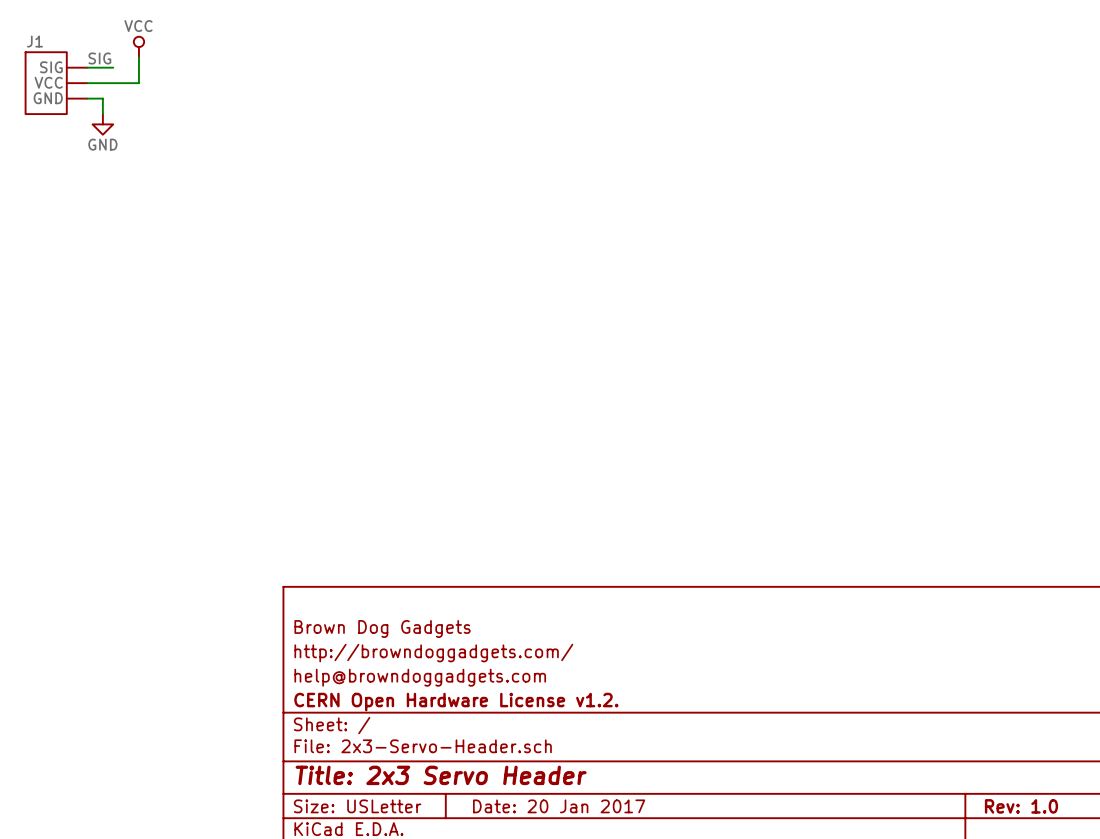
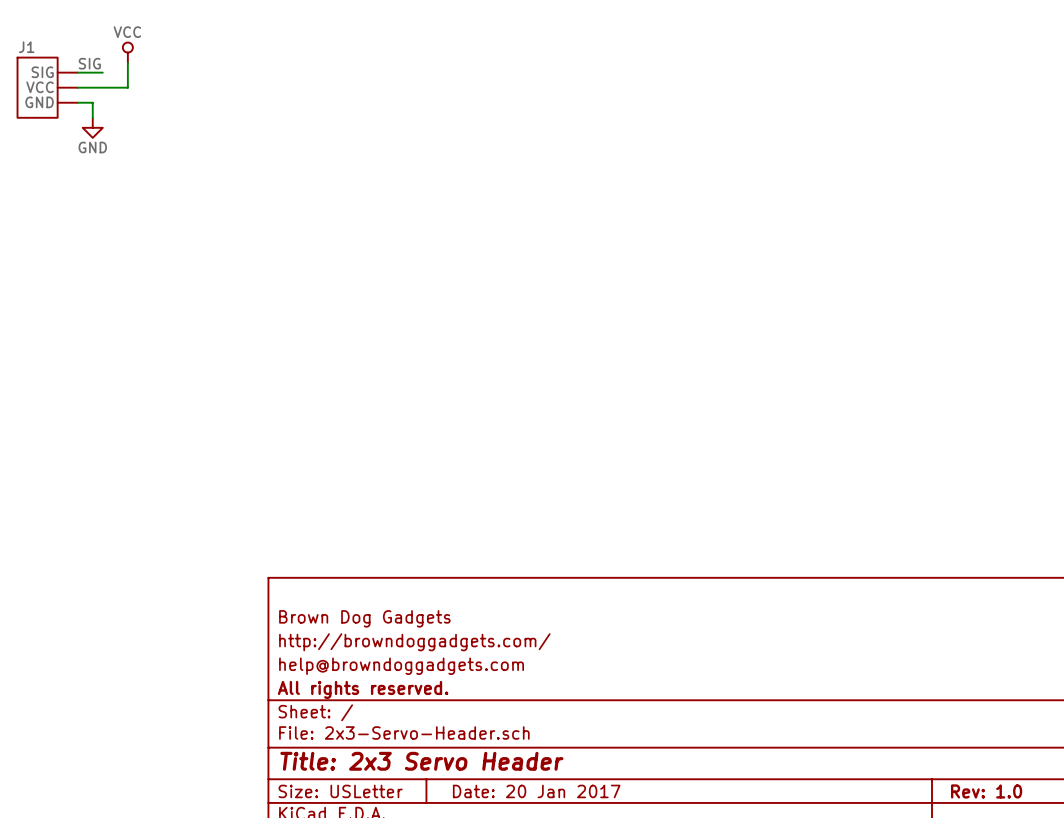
title block: CERN Open Hardware License v1.2. (456, 702) -> All rights reserved. (363, 689)

